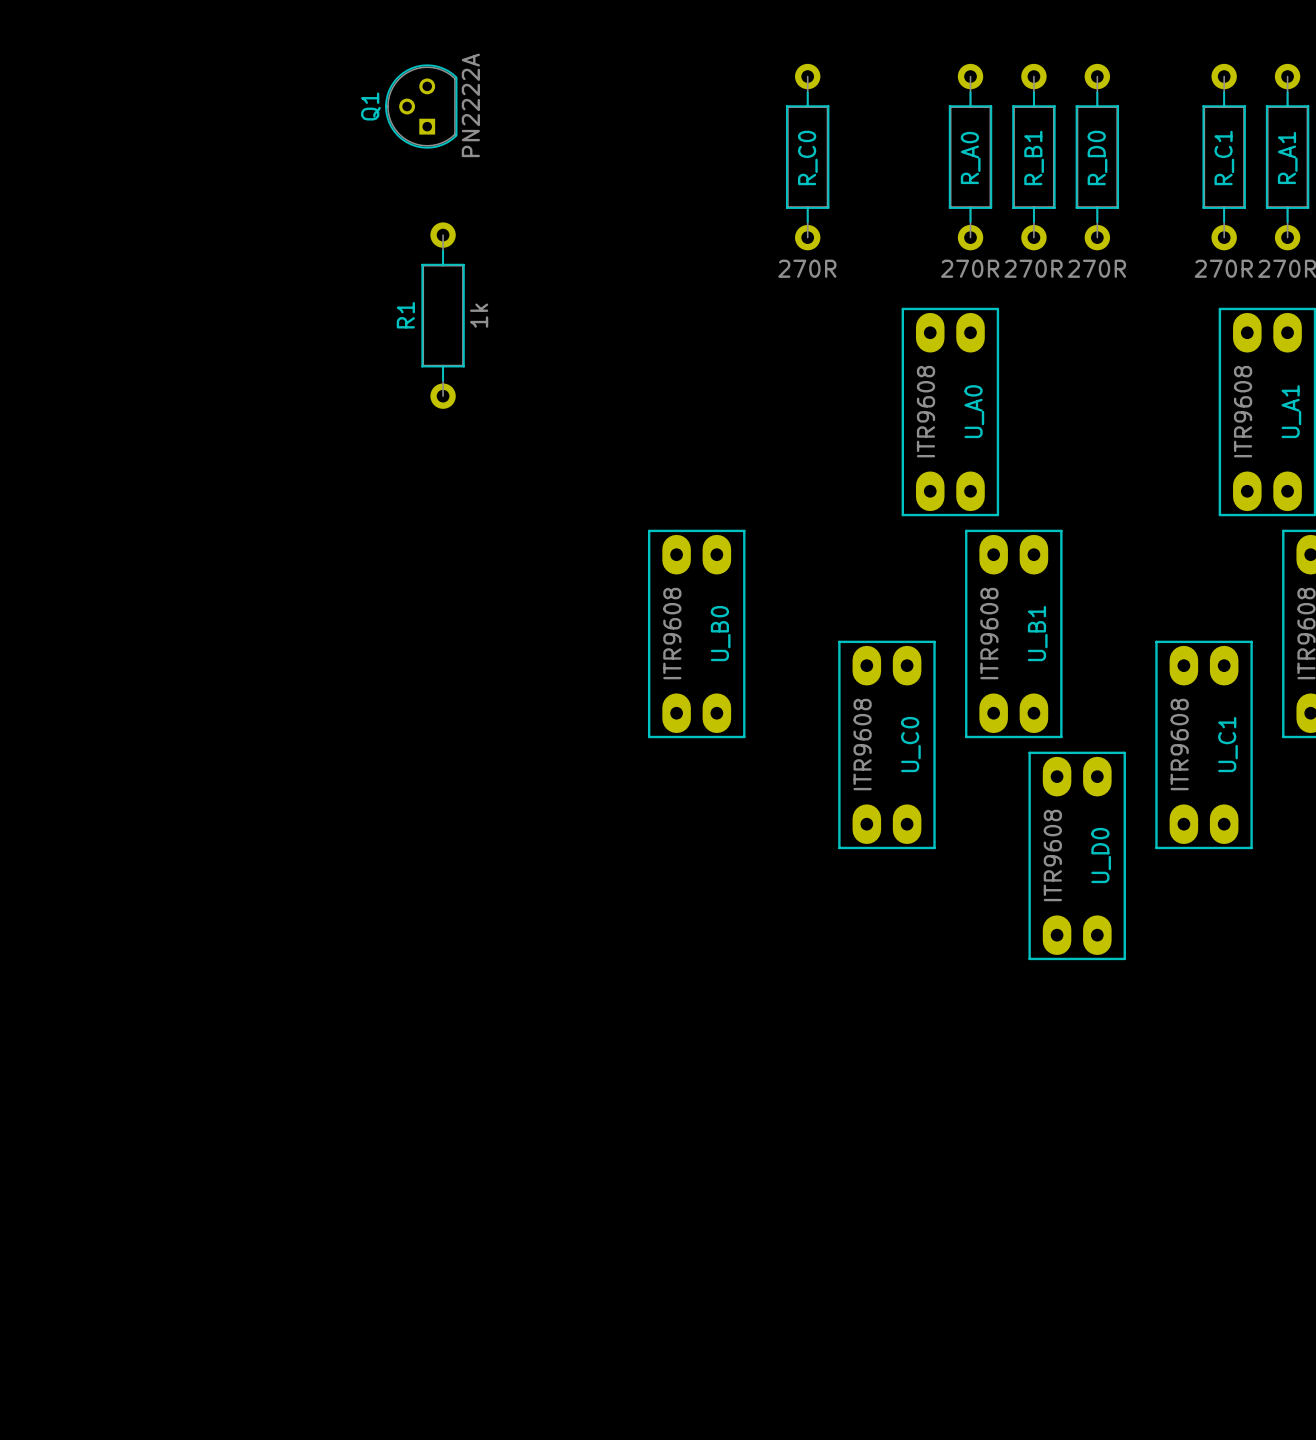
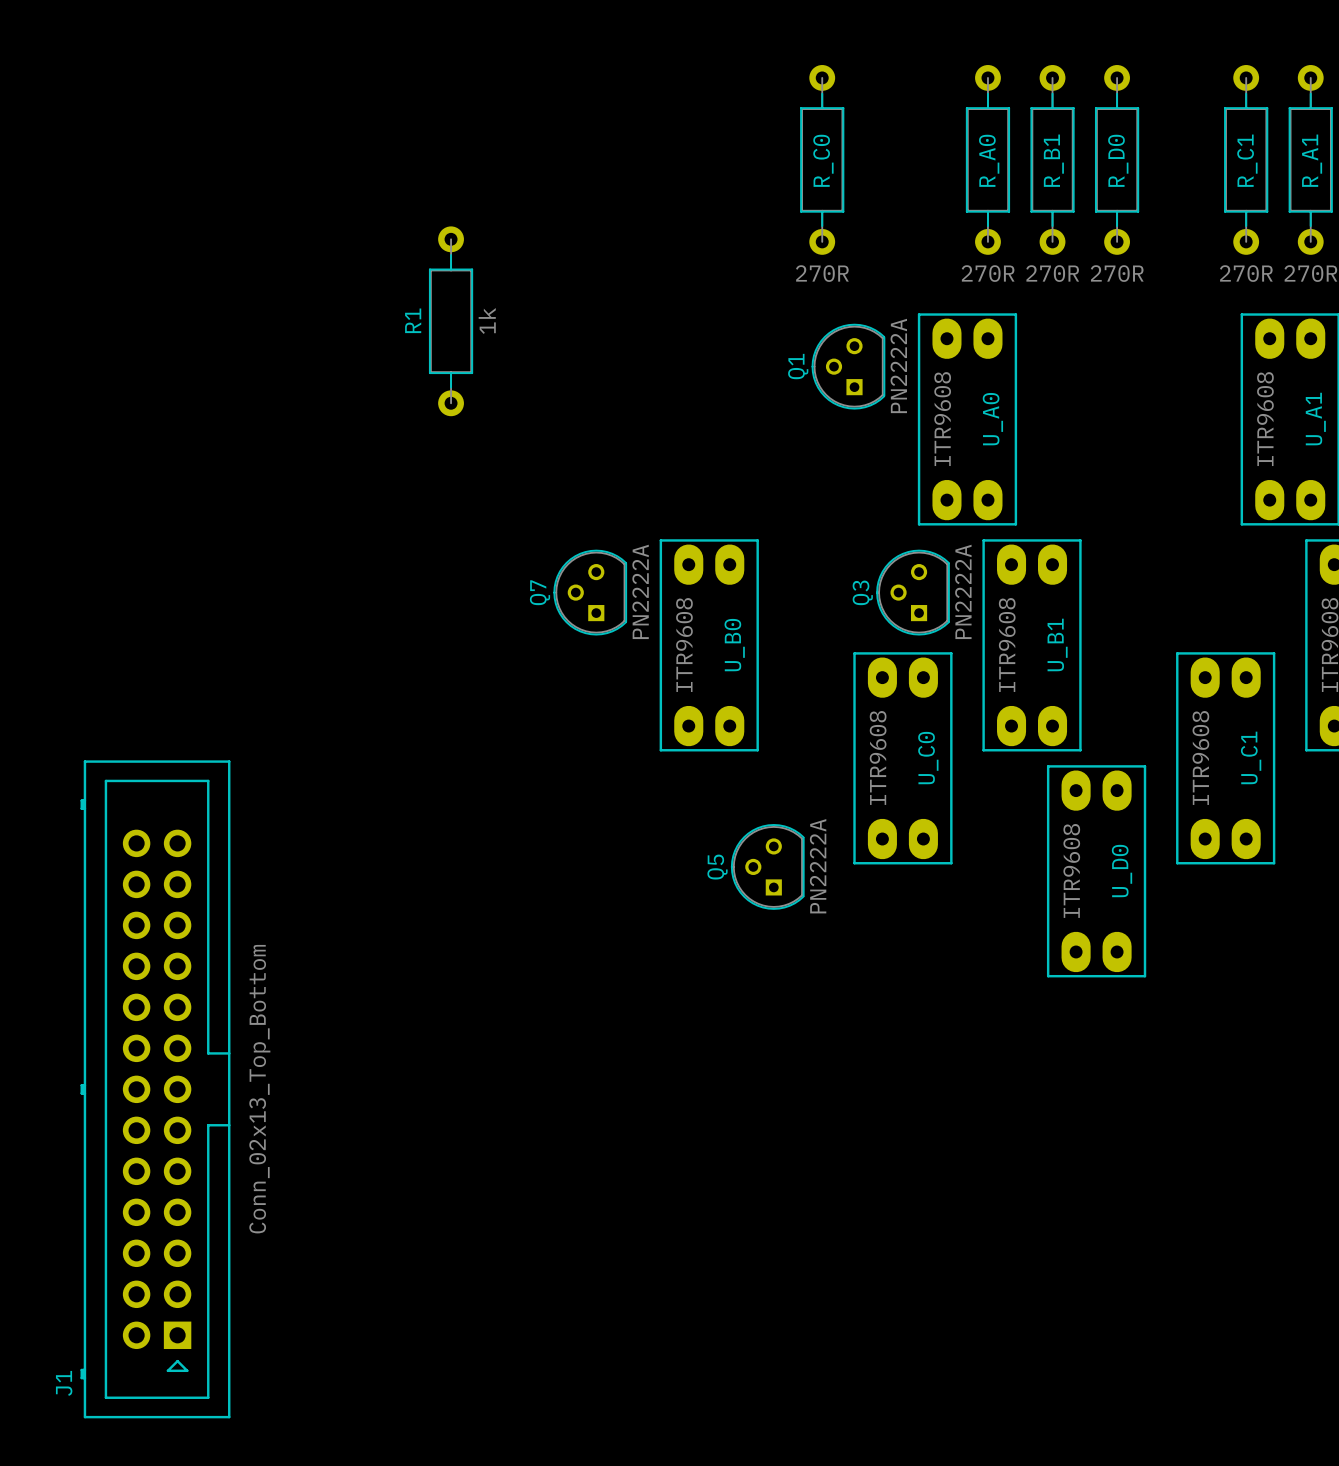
Q1 position: (421, 106) -> (848, 366)
Q7: none -> PN2222A (590, 592)
Q3: none -> PN2222A (913, 592)
Q5: none -> PN2222A (767, 866)
J1: none -> Conn_02x13_Top_Bottom (155, 1089)

